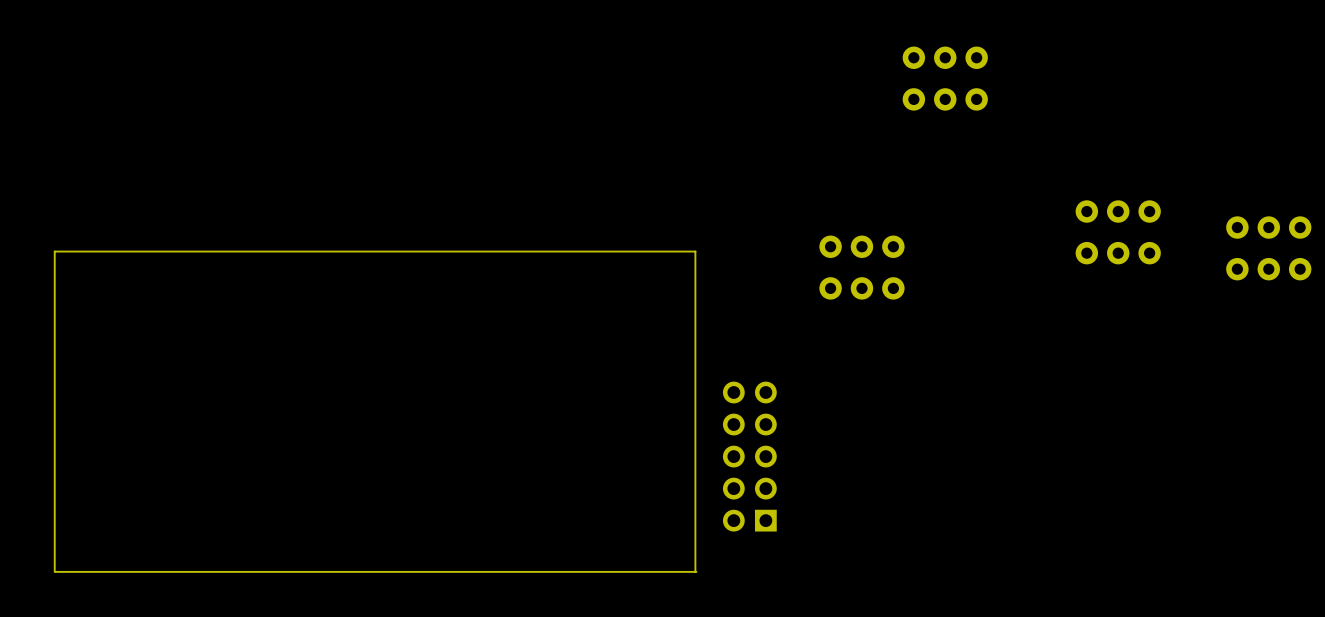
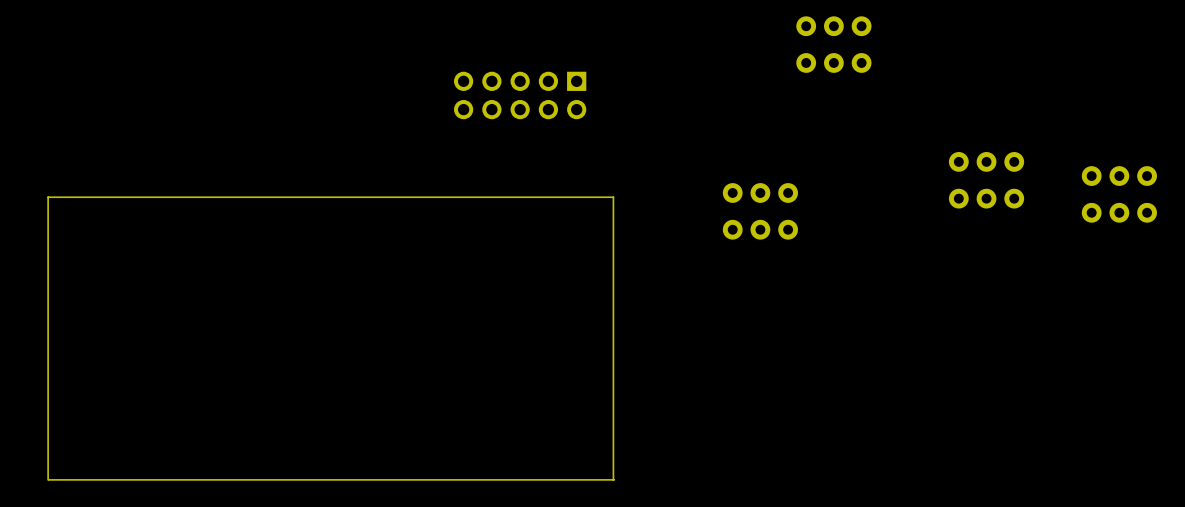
part: none -> (520, 95)
part: (749, 456) -> none

